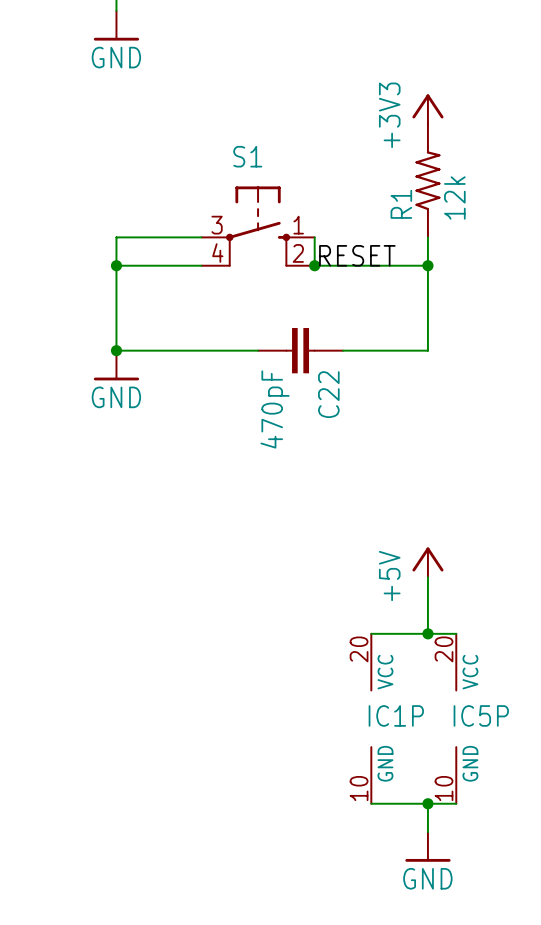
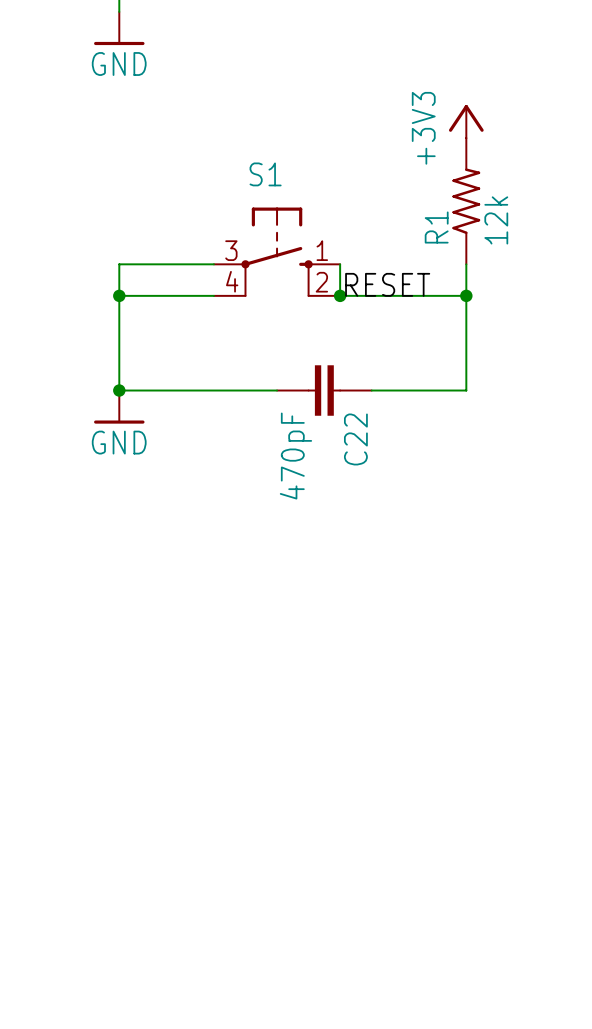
power symbol: +5V (427, 562) -> none
wire: (427, 577) (427, 633) -> none
wire: (371, 633) (456, 633) -> none
junction: (427, 633) -> none
IC1P: (371, 718) -> none
IC5P: (456, 718) -> none
wire: (371, 803) (456, 803) -> none
wire: (427, 803) (427, 832) -> none
junction: (427, 803) -> none
power symbol: GND (427, 846) -> none

